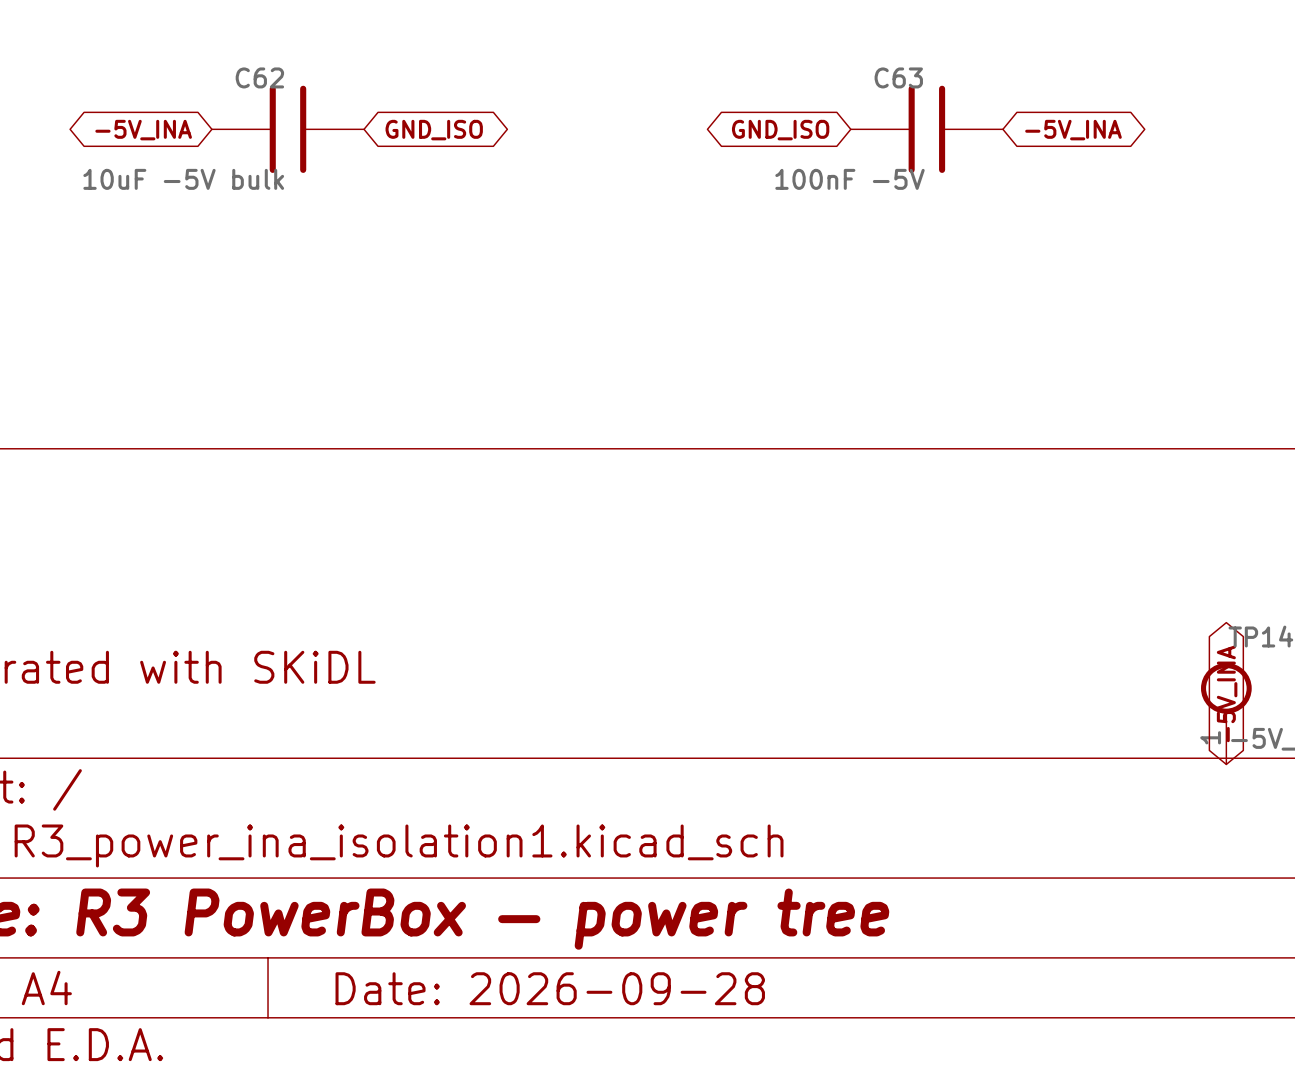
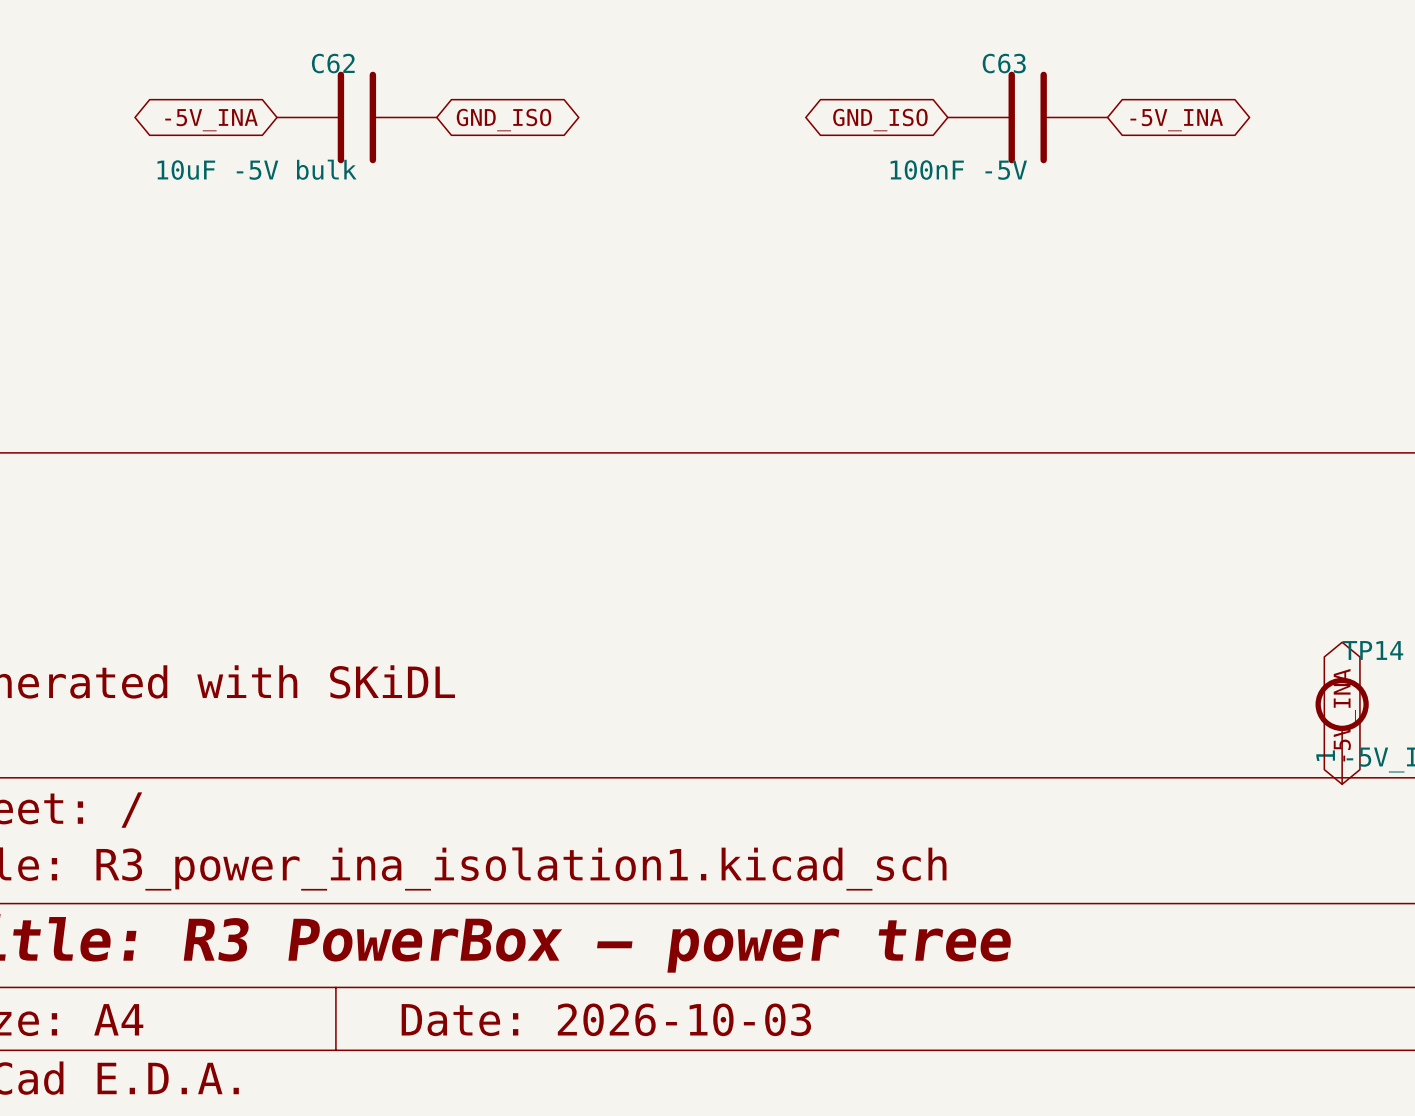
title block: Date: 2026-09-28 (550, 988) -> Date: 2026-10-03 (606, 1019)

